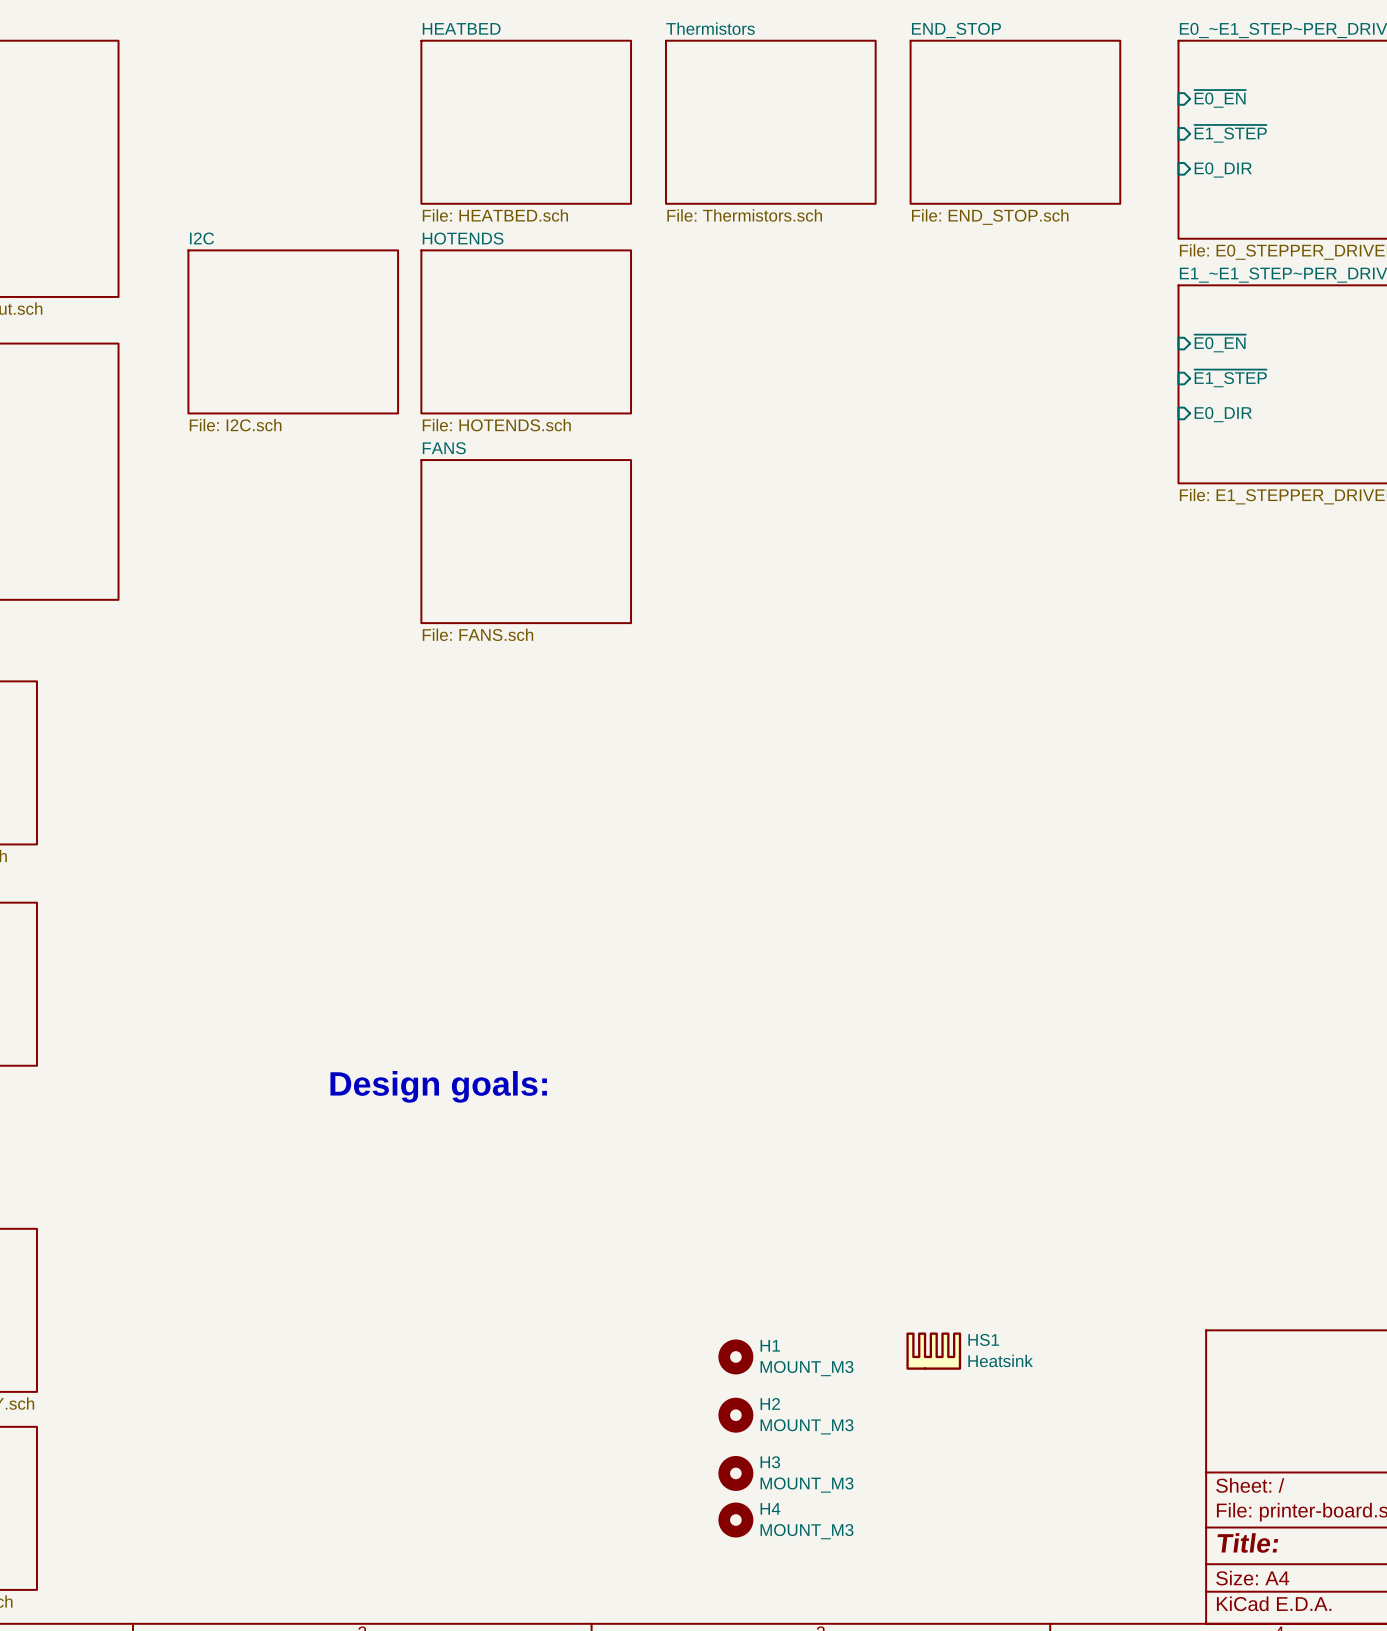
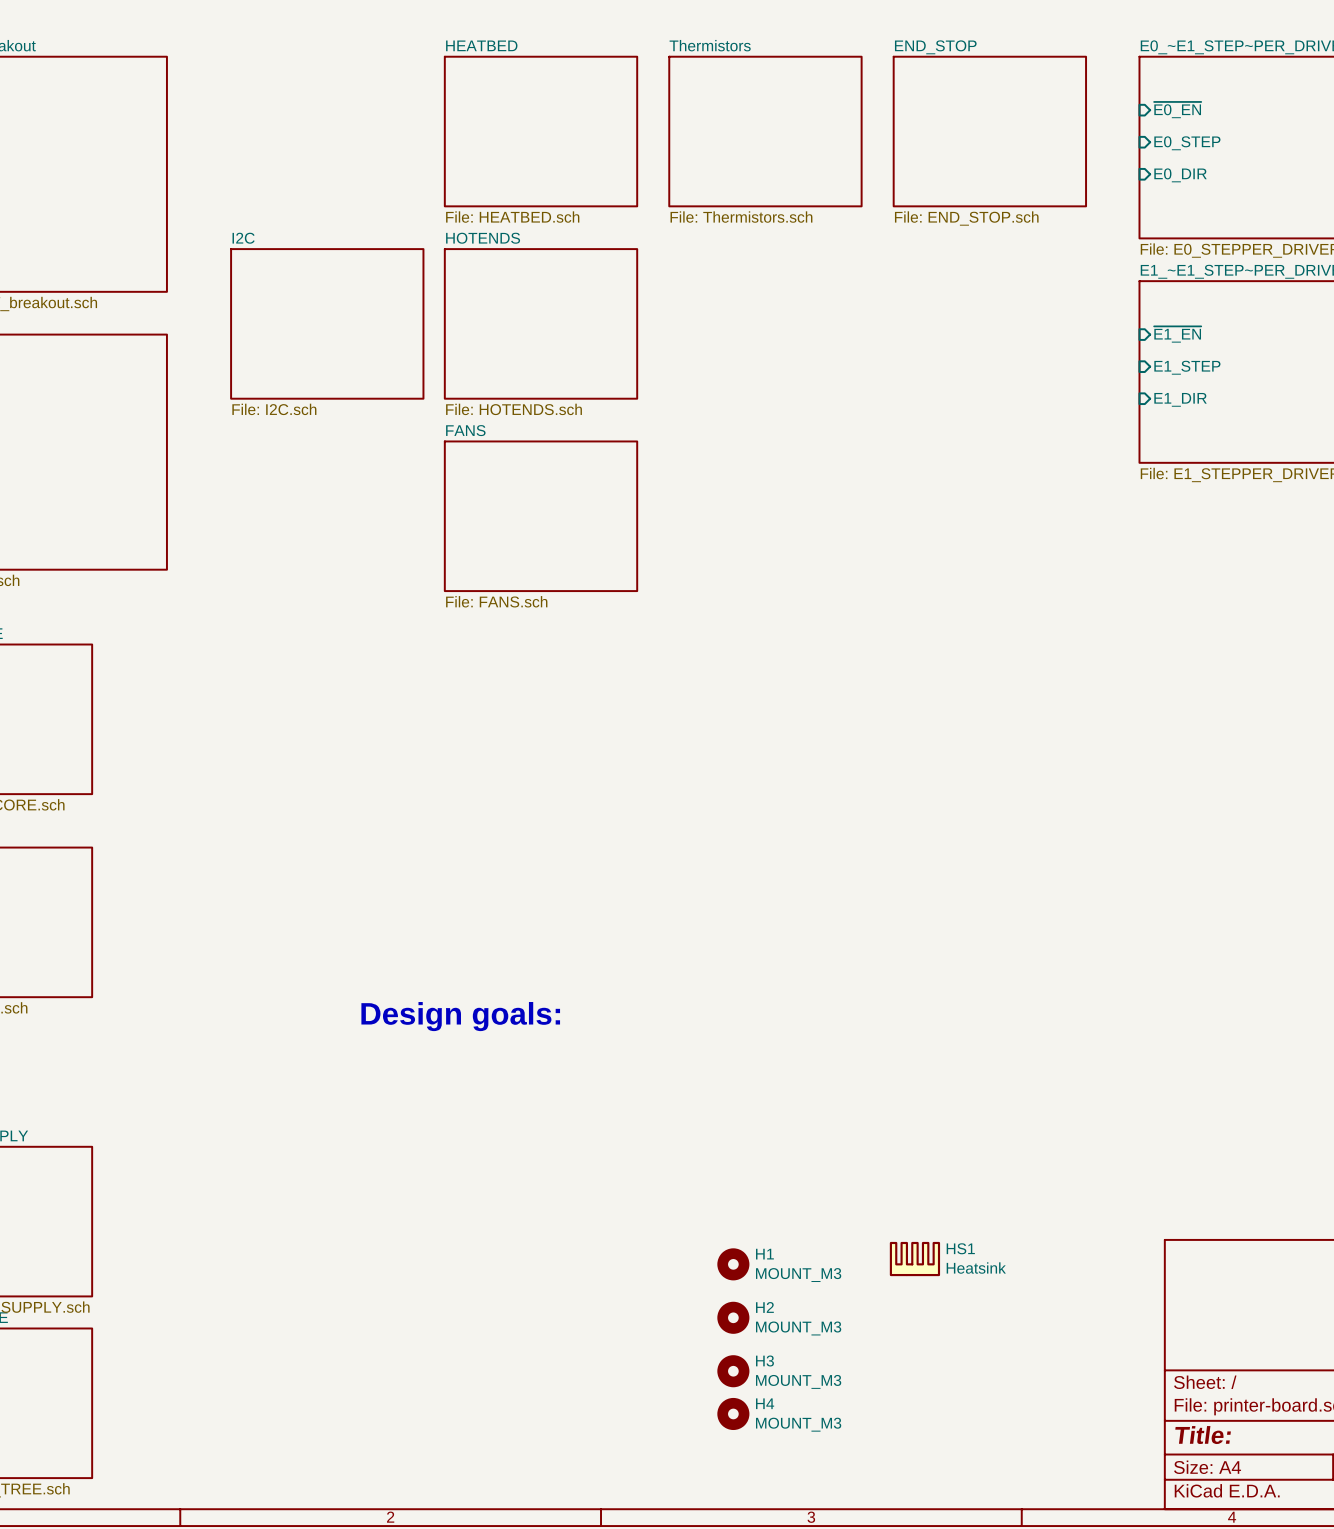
sheet pin: ~{E1_STEP} (1230, 133) -> E0_STEP (1187, 143)
sheet pin: ~{E0_EN} (1220, 343) -> ~{E1_EN} (1177, 334)
sheet pin: ~{E1_STEP} (1230, 378) -> E1_STEP (1187, 367)
sheet pin: E0_DIR (1223, 414) -> E1_DIR (1180, 399)

